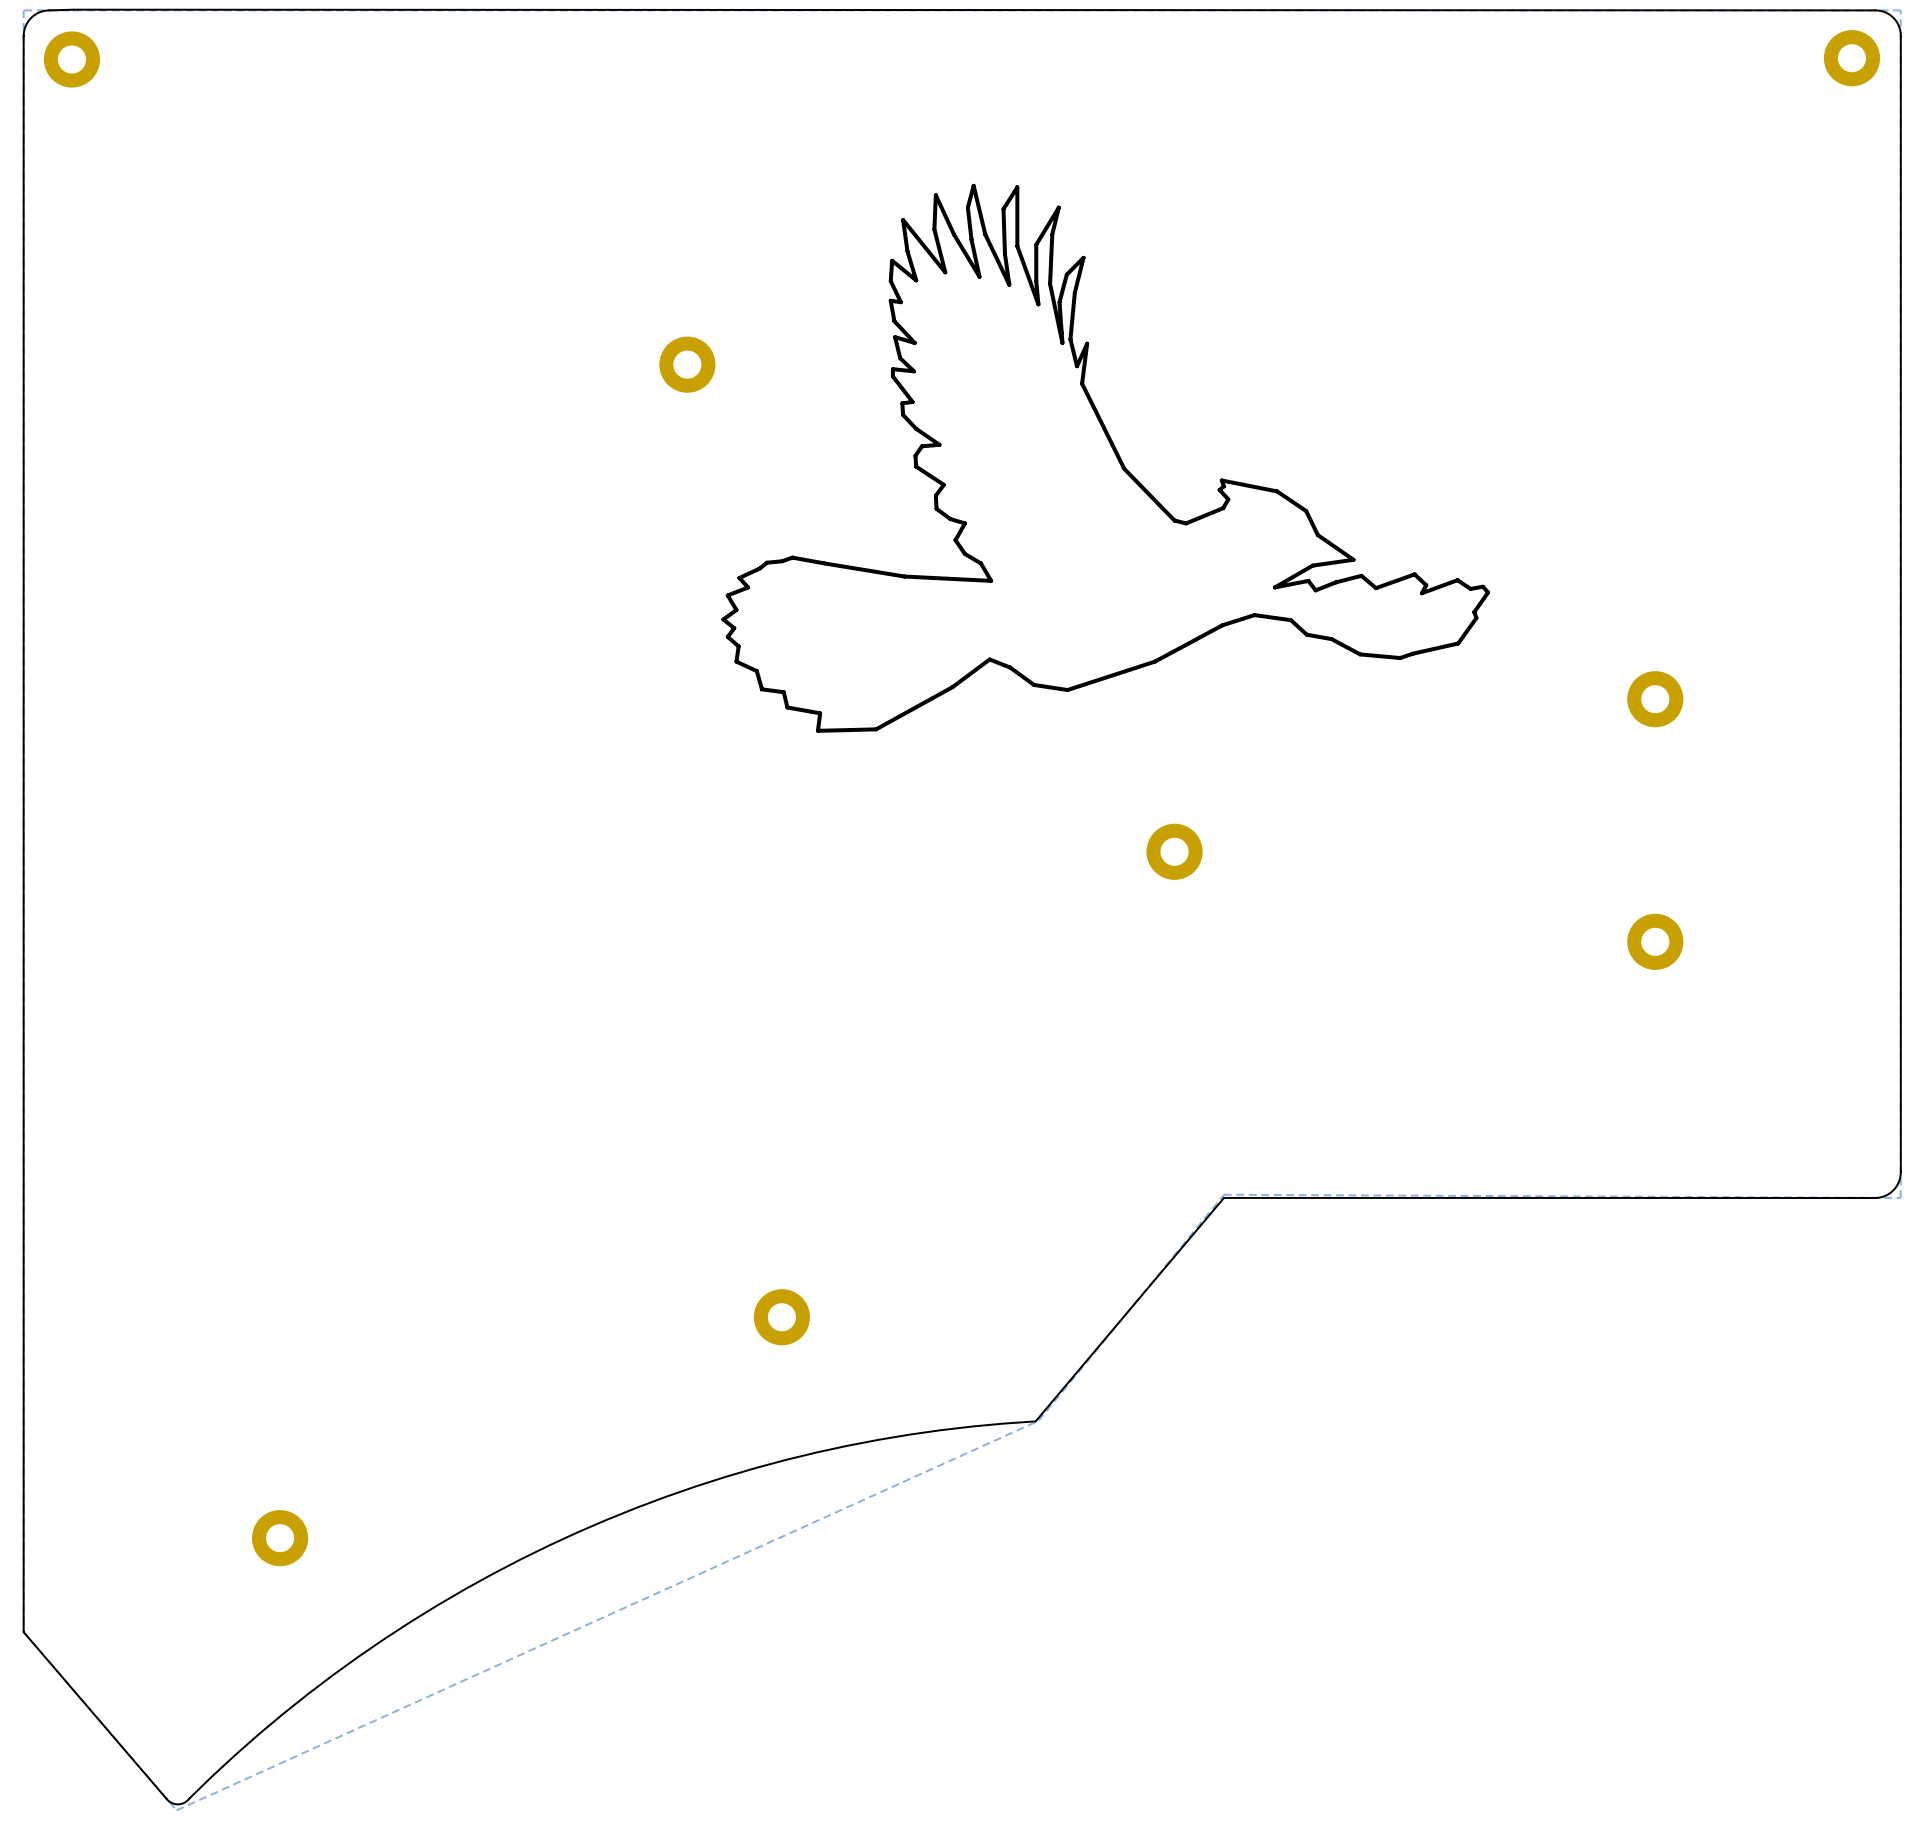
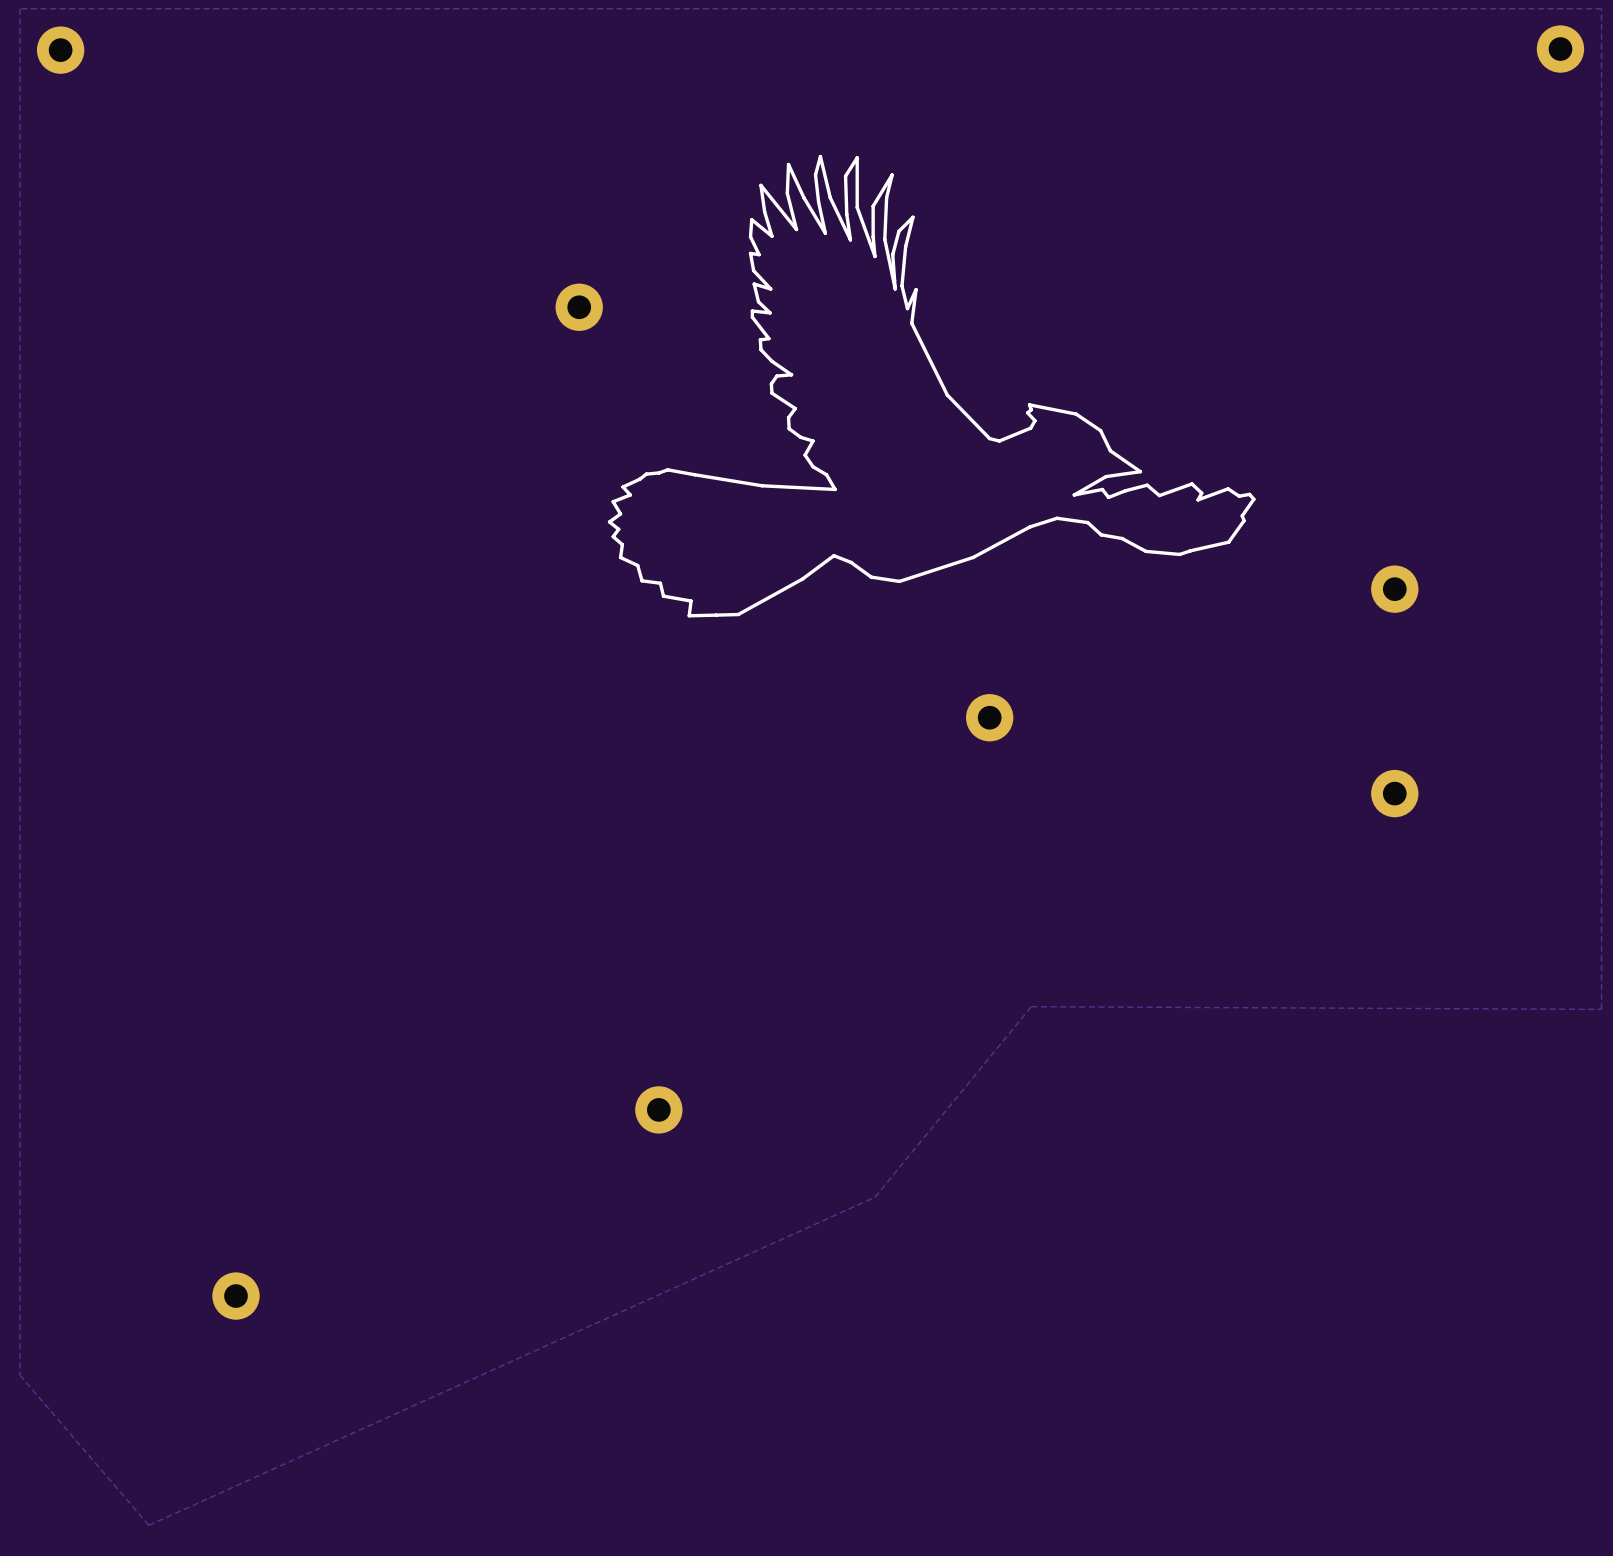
board edge: (73, 9) (45, 10) (36, 13) (27, 23) (23, 35) (23, 1632) (169, 1801) (178, 1804) (186, 1801) (235, 1755) (283, 1714) (332, 1675) (384, 1638) (437, 1605) (492, 1573) (577, 1532) (636, 1508) (695, 1486) (755, 1468) (817, 1452) (910, 1434) (972, 1426) (1035, 1421) (1223, 1197) (1875, 1198) (1888, 1194) (1897, 1185) (1900, 1172) (1900, 35) (1896, 22) (1888, 14) (1875, 10) (73, 9) -> none

